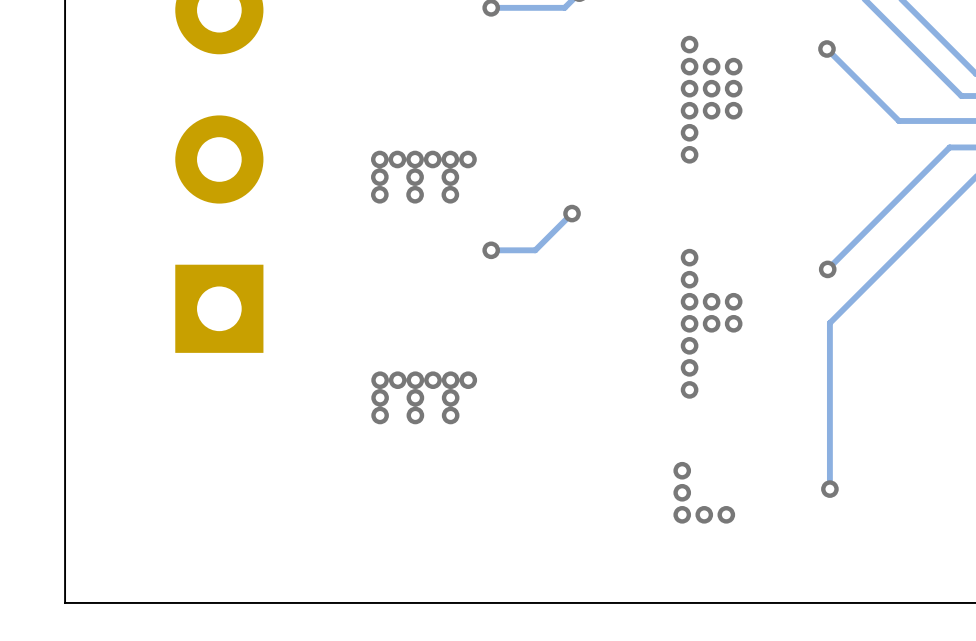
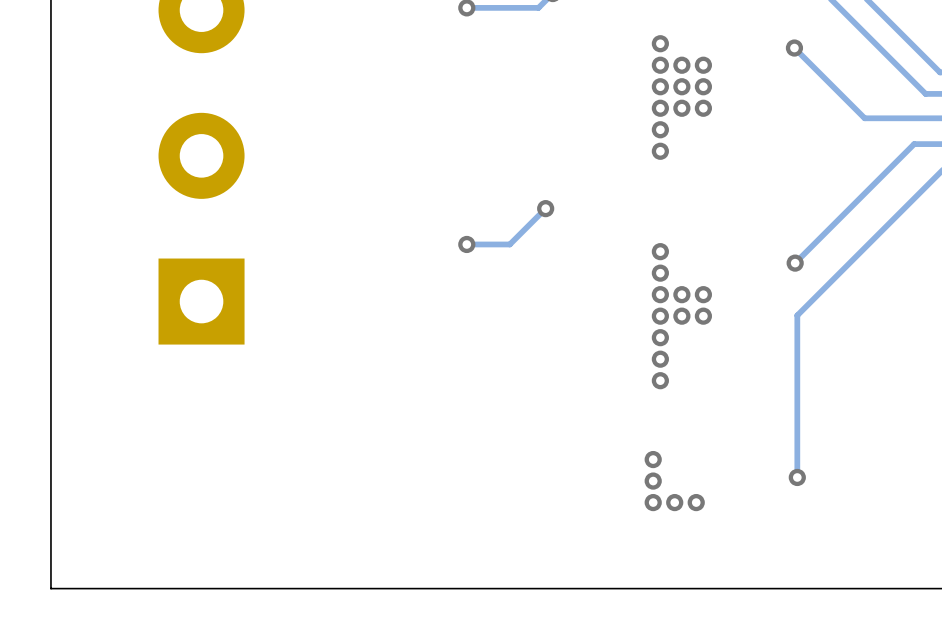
via: (379, 159) -> none
via: (397, 159) -> none
via: (415, 159) -> none
via: (432, 159) -> none
via: (450, 159) -> none
via: (467, 159) -> none
via: (379, 177) -> none
via: (415, 177) -> none
via: (450, 177) -> none
via: (379, 194) -> none
via: (415, 194) -> none
via: (450, 194) -> none
via: (380, 380) -> none
via: (397, 380) -> none
via: (415, 380) -> none
via: (433, 380) -> none
via: (450, 380) -> none
via: (468, 380) -> none
via: (380, 397) -> none
via: (415, 397) -> none
via: (450, 397) -> none
via: (380, 415) -> none
via: (415, 415) -> none
via: (450, 415) -> none

